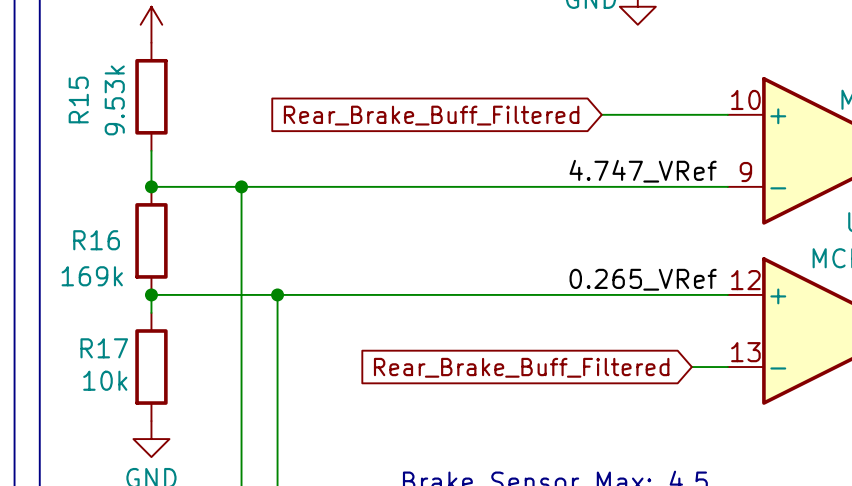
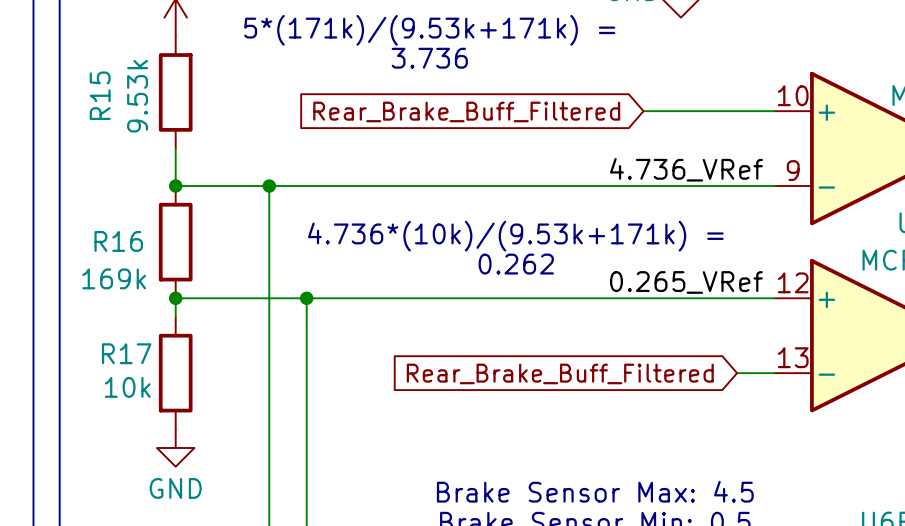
text: none -> 5*(171k)/(9.53k+171k) = (429, 30)
text: none -> 3.736 (429, 58)
label: 4.747_VRef (643, 171) -> 4.736_VRef (686, 169)
text: none -> 4.736*(10k)/(9.53k+171k) = (515, 236)
text: none -> 0.262 (516, 264)

